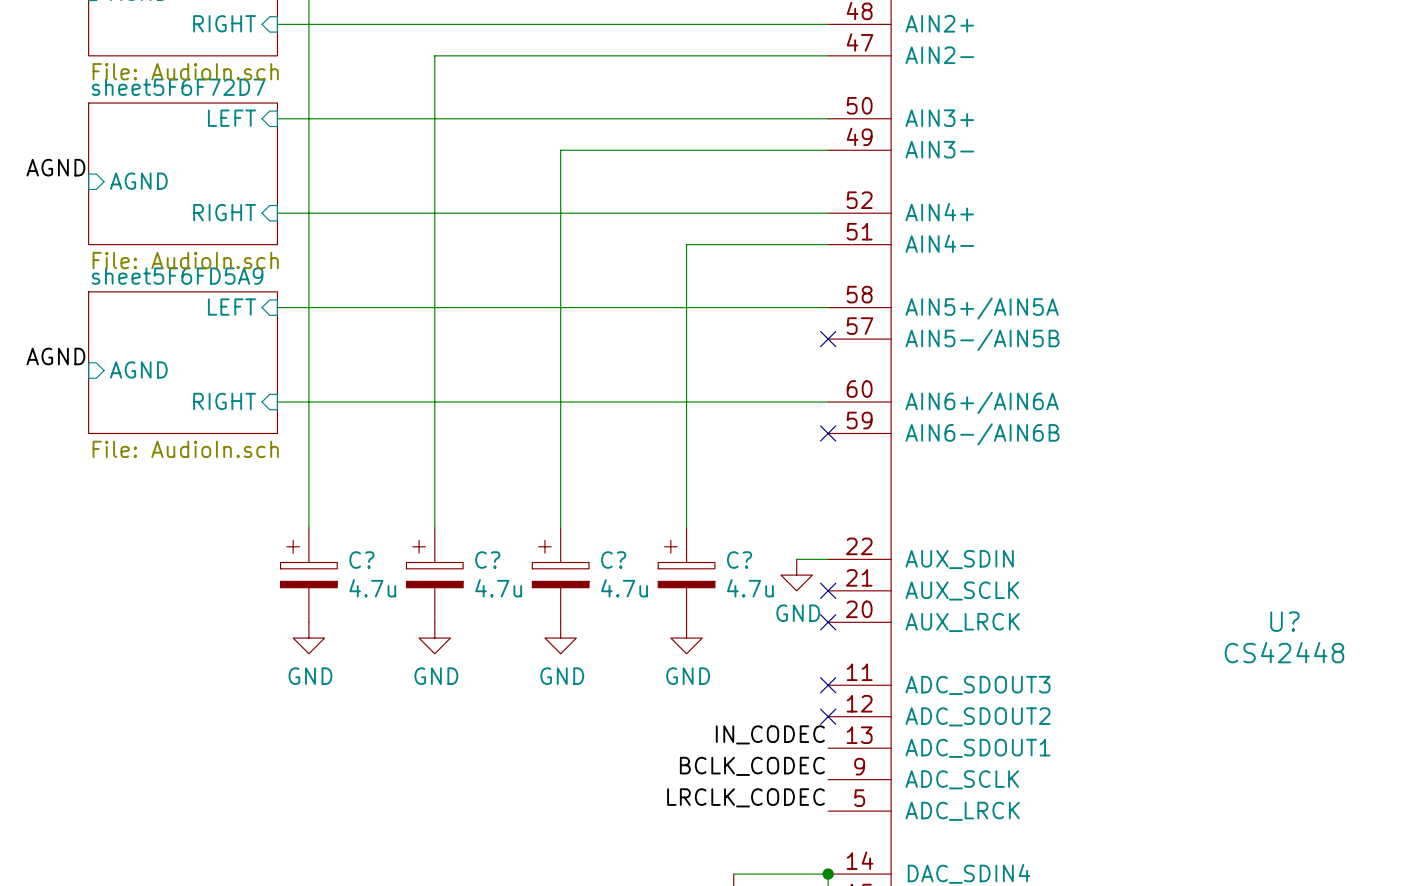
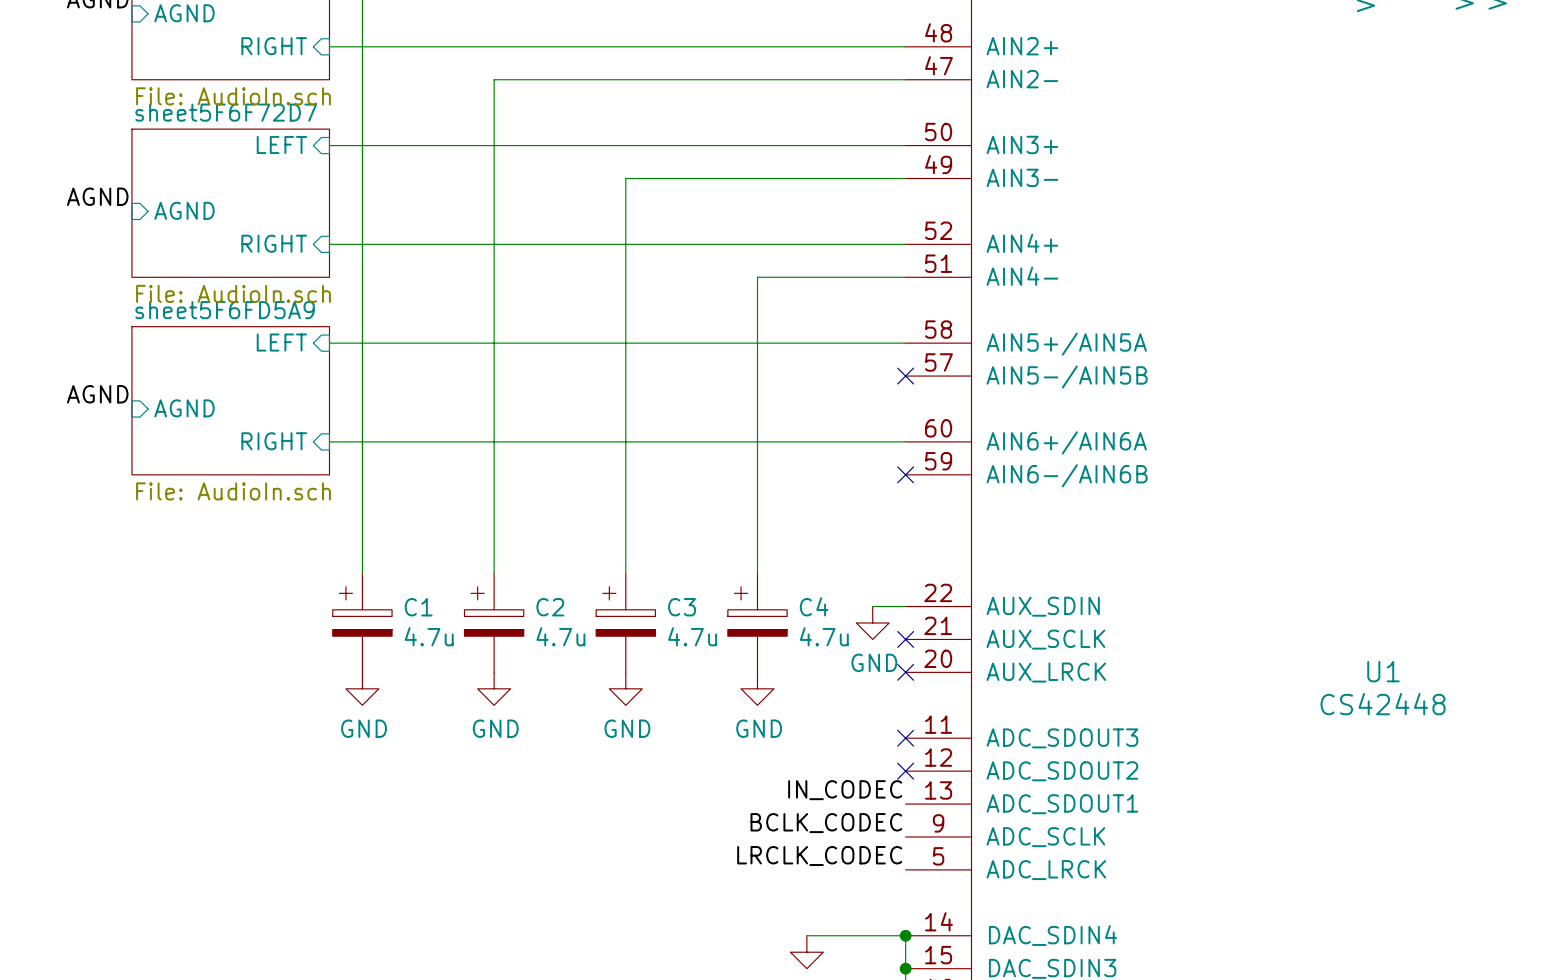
C? name: C? (361, 560) -> C1 (418, 607)
C? name: C? (487, 560) -> C2 (550, 607)
C? name: C? (613, 560) -> C3 (682, 607)
C? name: C? (739, 560) -> C4 (814, 606)
U? name: U? (1284, 621) -> U1 (1383, 671)

